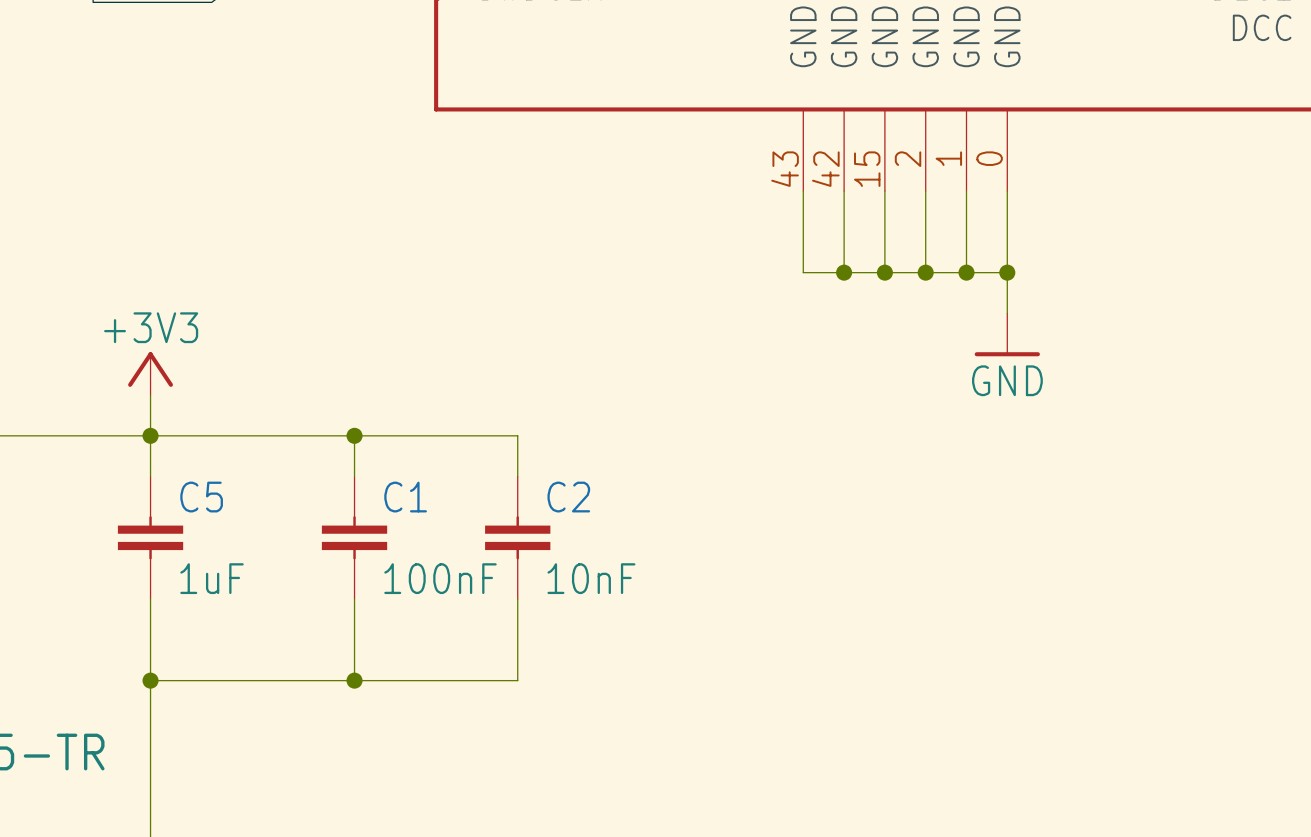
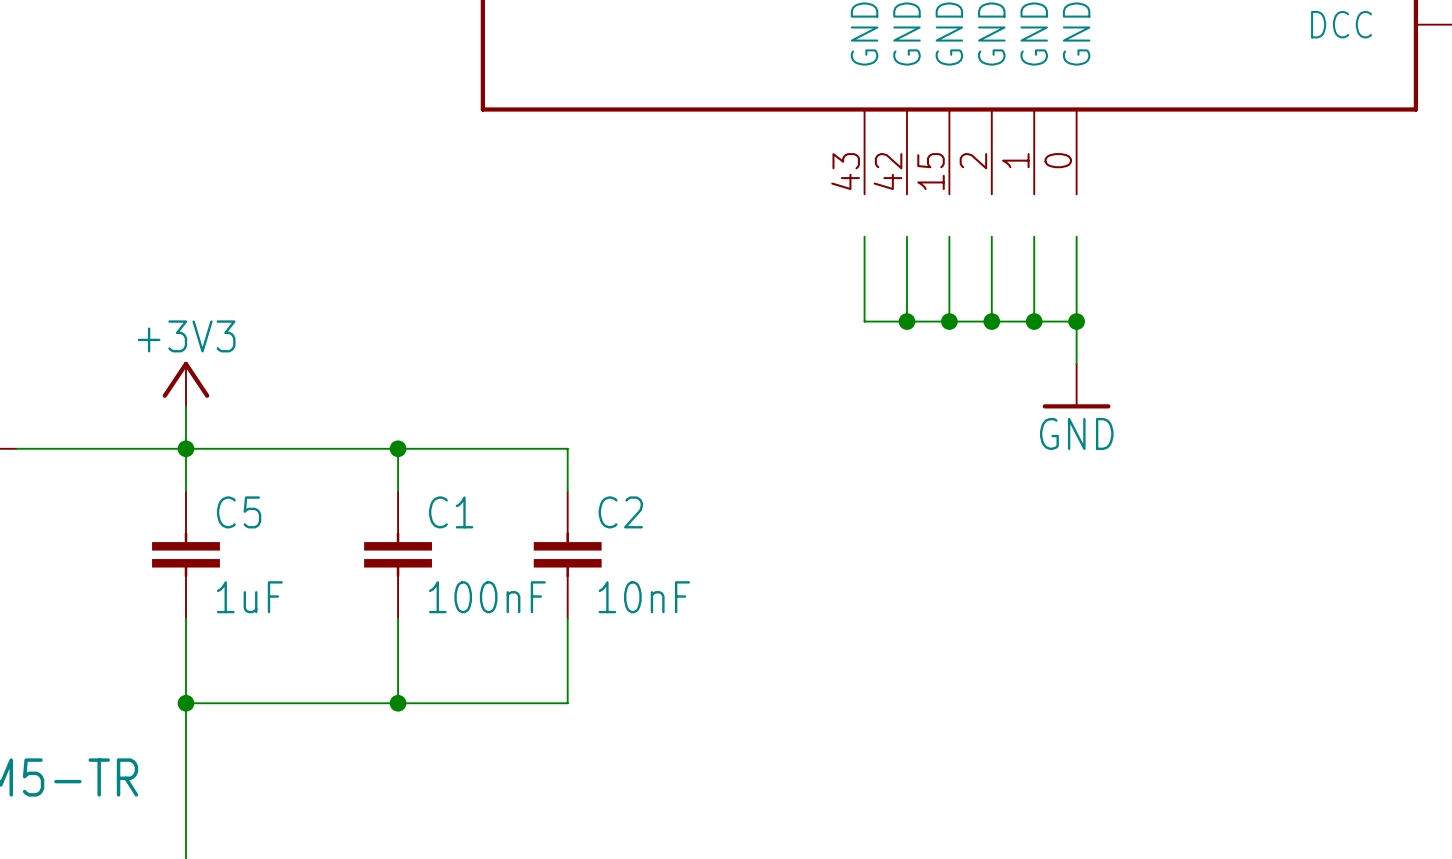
wire: (803, 191) (803, 231) -> none
wire: (844, 191) (844, 231) -> (906, 279) (906, 321)
wire: (884, 191) (884, 231) -> (949, 279) (949, 321)
wire: (925, 191) (925, 231) -> (991, 279) (991, 321)
wire: (966, 191) (966, 231) -> (1034, 279) (1034, 321)
wire: (1007, 191) (1007, 231) -> none
wire: (803, 272) (1007, 272) -> (864, 279) (864, 321) (1076, 321) (1076, 363)
junction: (844, 272) -> none
junction: (884, 272) -> none
junction: (925, 272) -> none
junction: (966, 272) -> none
junction: (1007, 272) -> none
junction: none -> (906, 321)
junction: none -> (949, 321)
junction: none -> (991, 321)
junction: none -> (1034, 321)
junction: none -> (1076, 321)
power symbol position: GND (1007, 334) -> GND (1076, 386)

